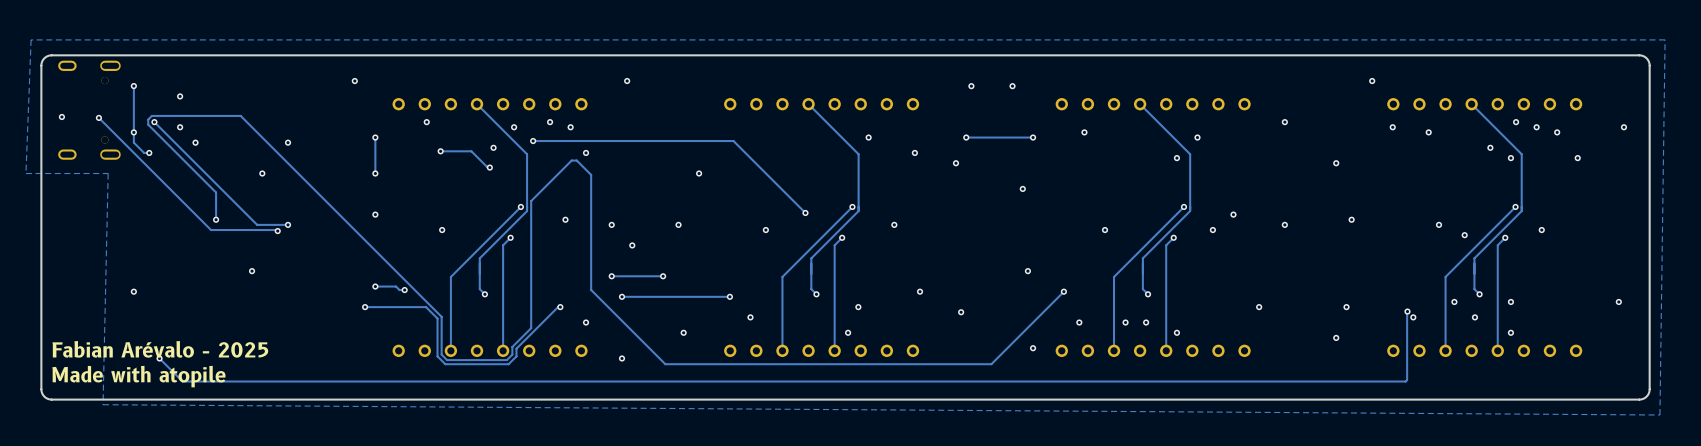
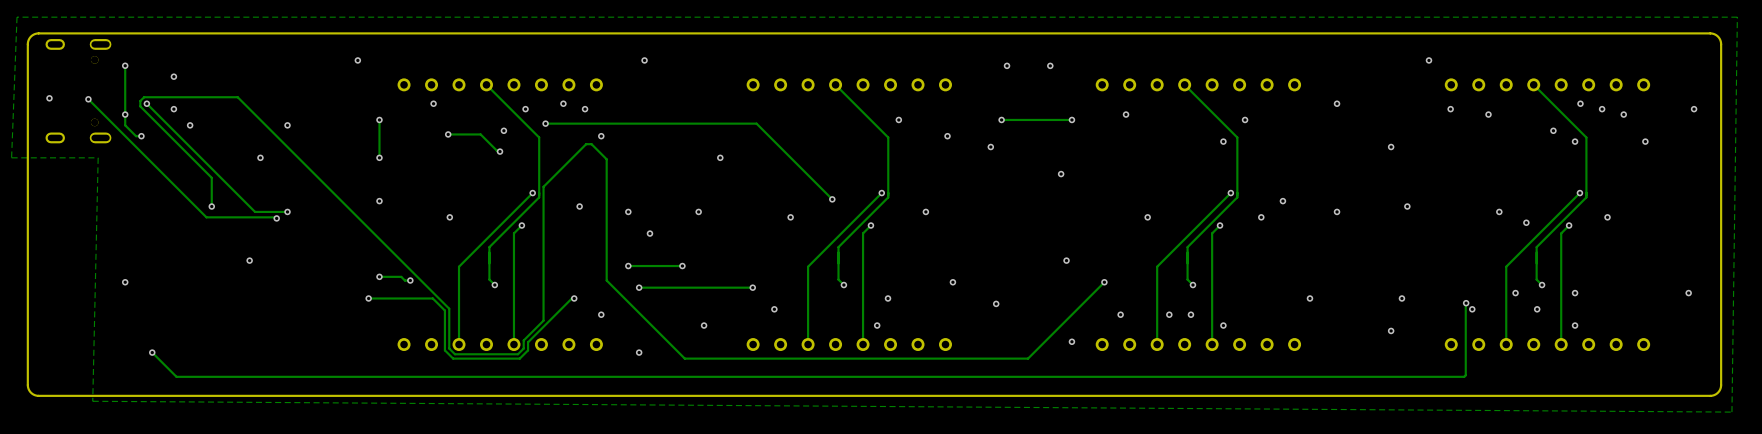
text: Fabian Arévalo - 2025 (160, 349) -> none
text: Made with atopile (138, 376) -> none

